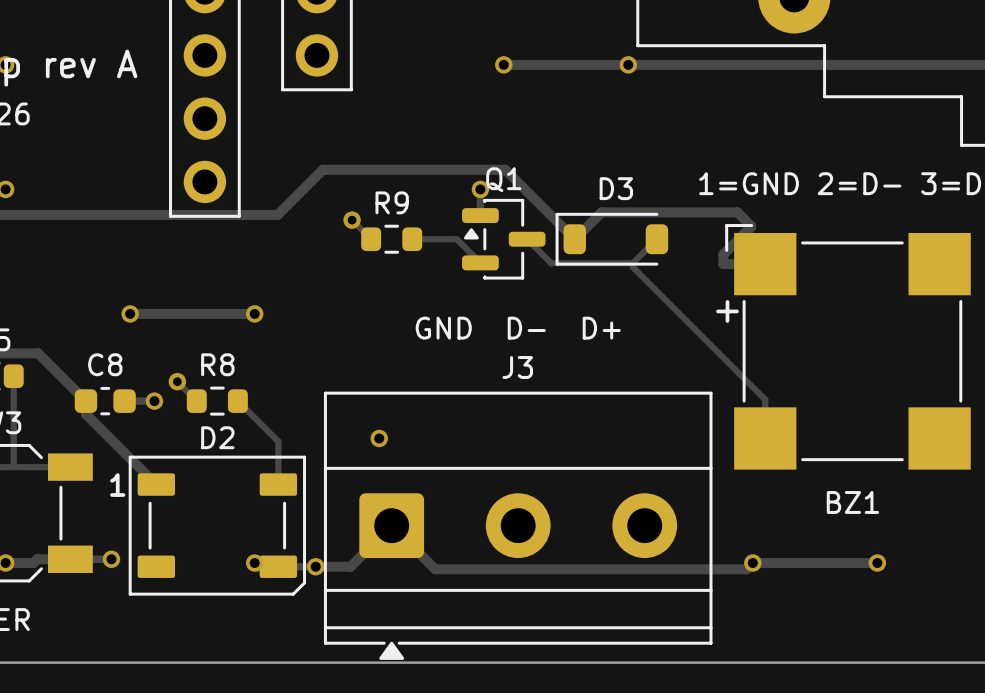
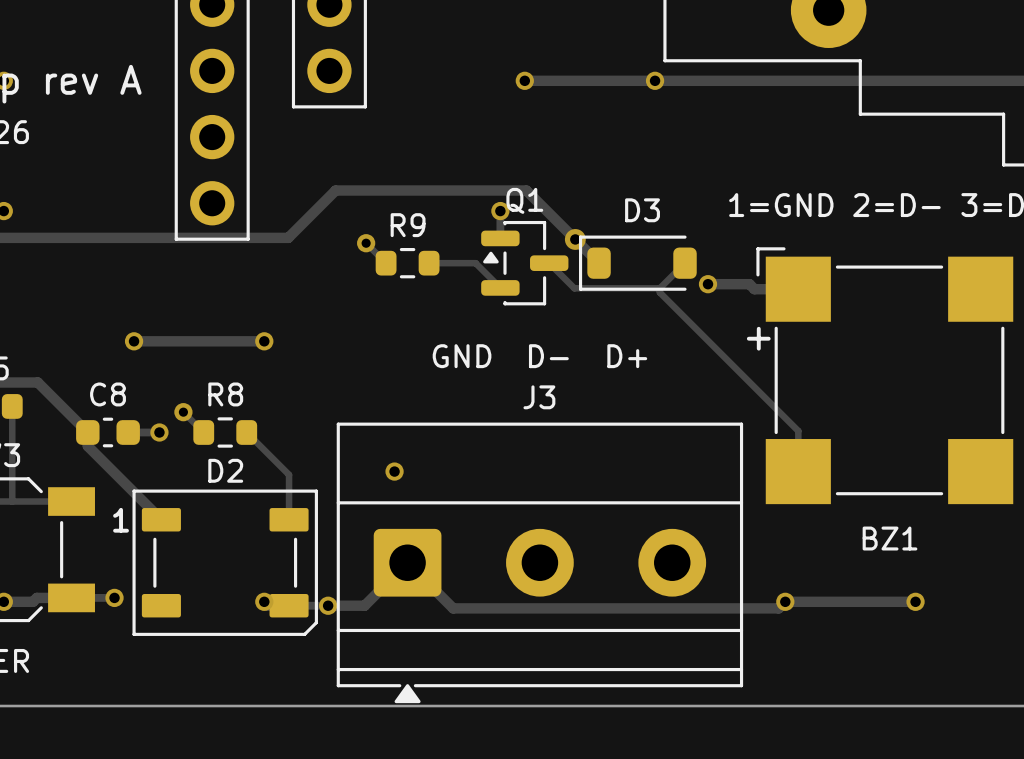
via: none -> (575, 239)
track: (574, 239) (601, 212) (737, 212) (751, 226) (723, 254) (723, 264) -> (708, 284) (749, 284) (754, 289)
via: none -> (708, 284)

